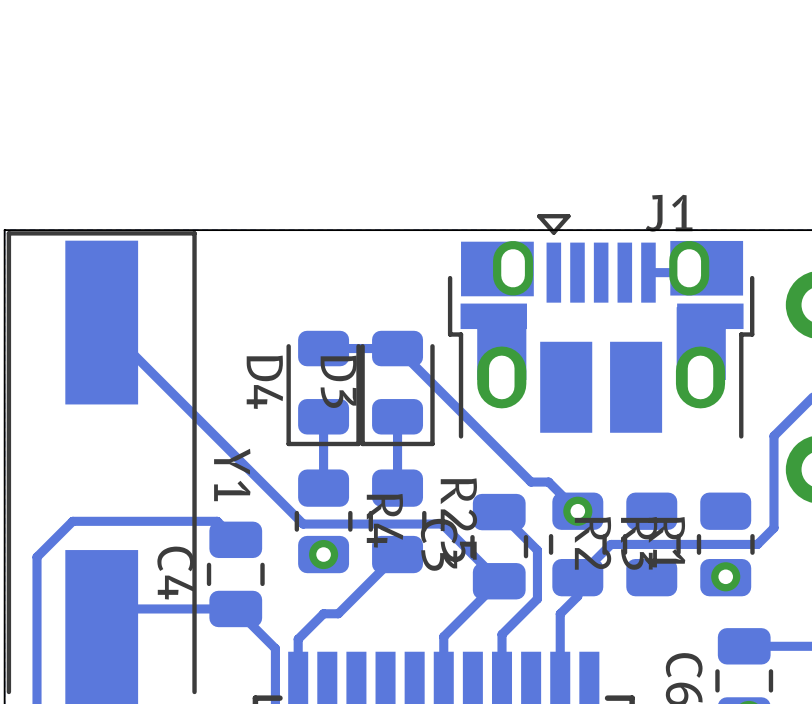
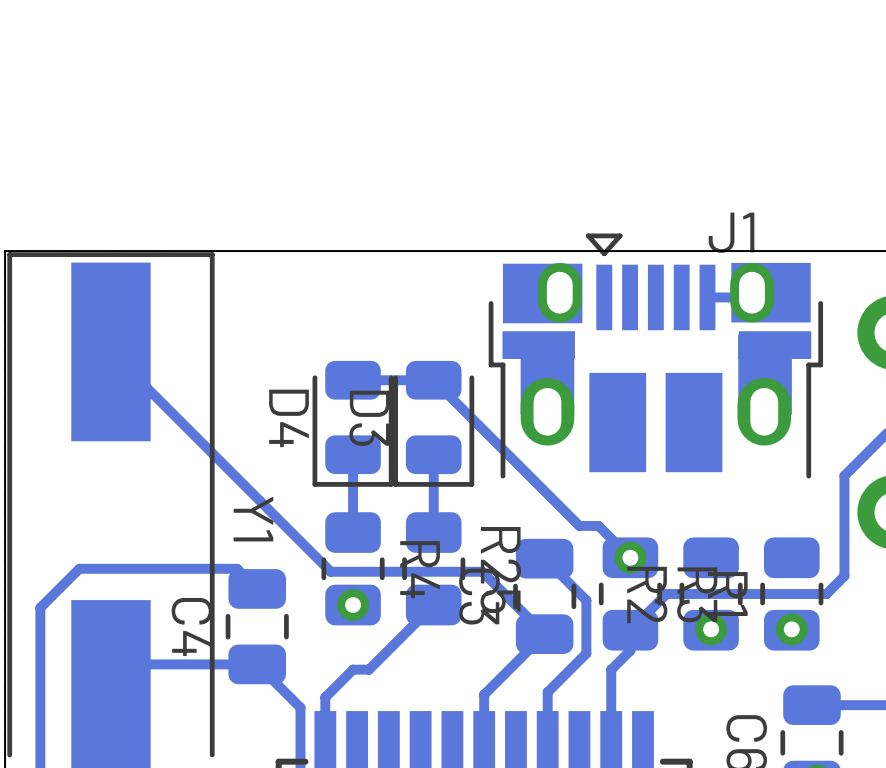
via: none -> (711, 629)

